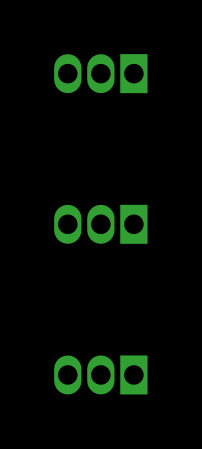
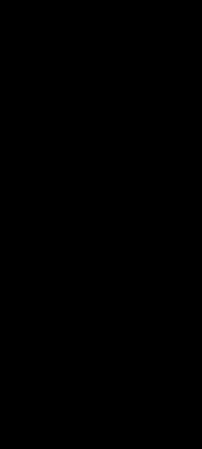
part: (100, 73) -> none
part: (100, 224) -> none
part: (100, 374) -> none

